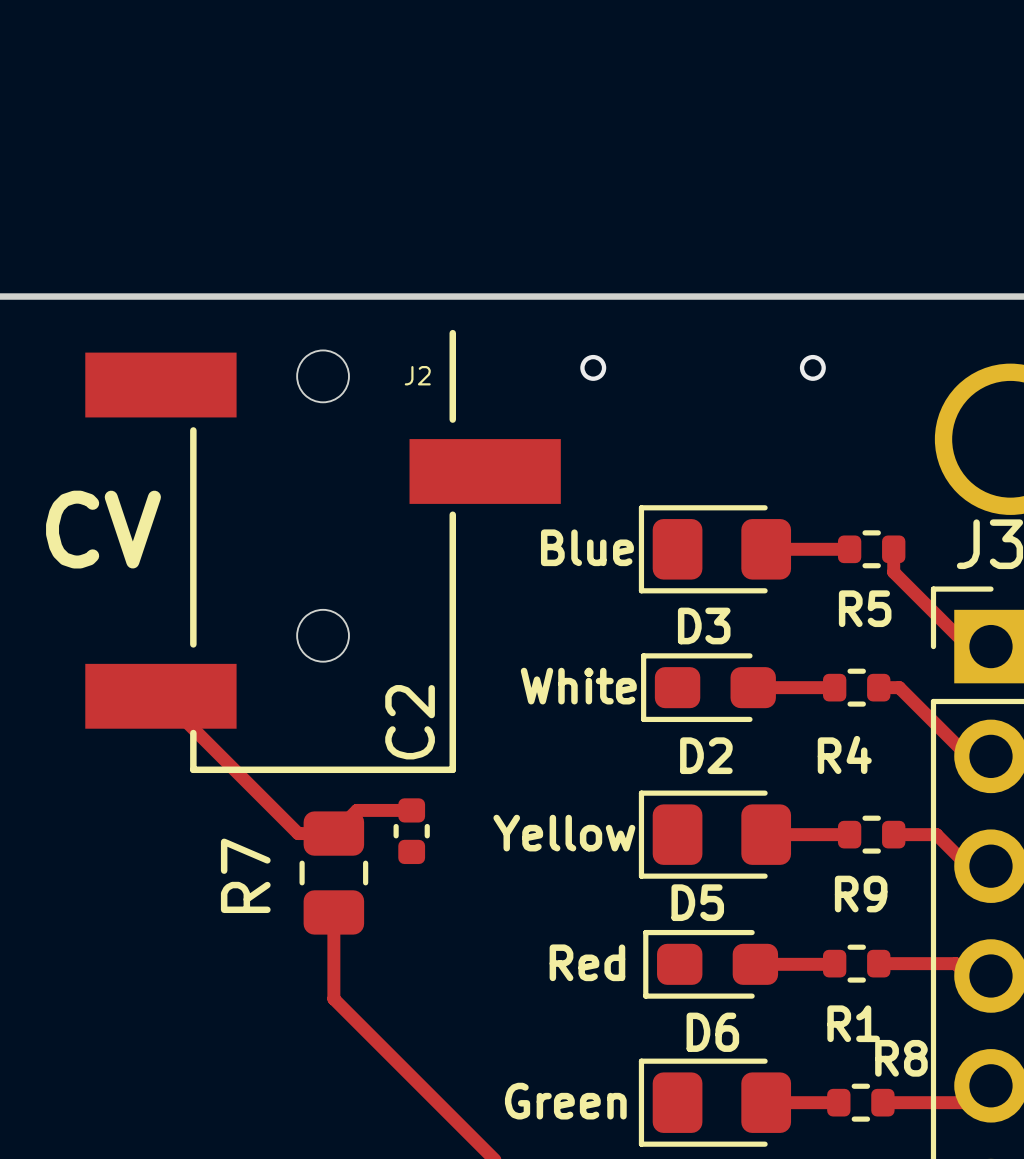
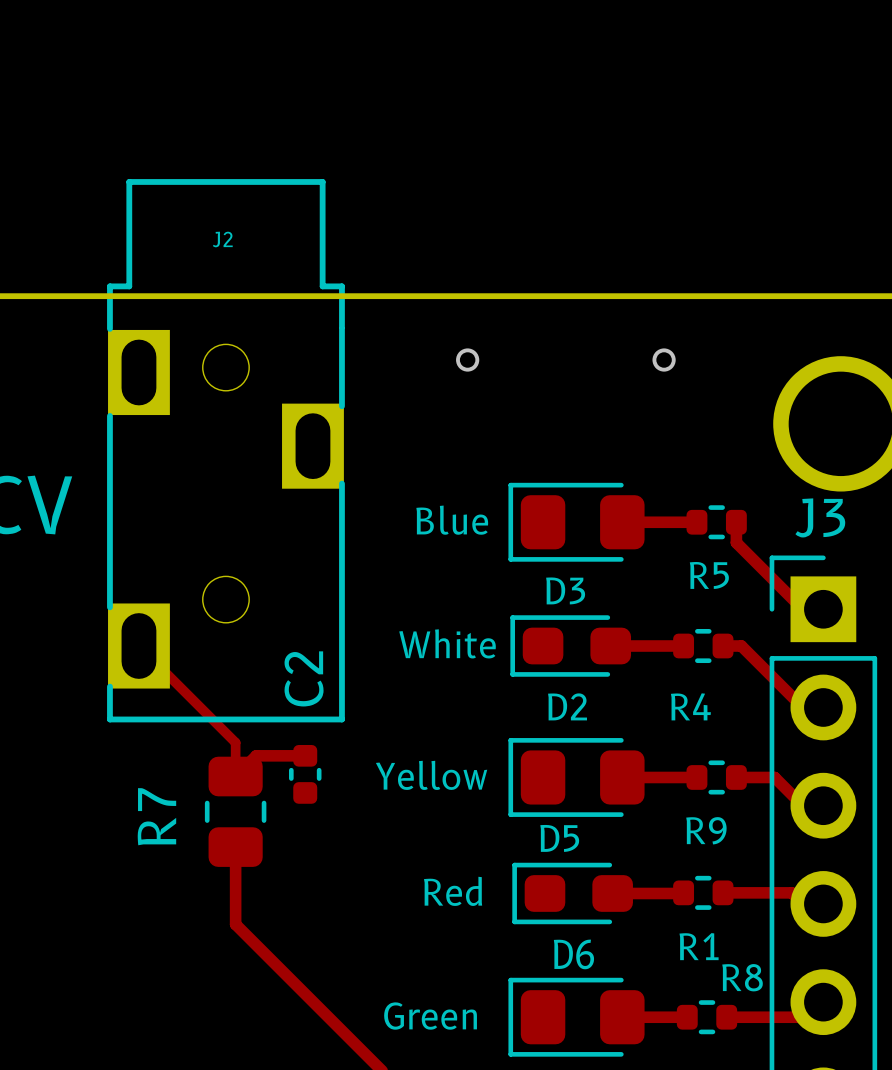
J2 footprint: [85, 329, 561, 774] -> [107, 179, 345, 723]
J2 name position: J2 (417, 375) -> J2 (222, 239)
track: (160, 696) (298, 833) (333, 833) -> (138, 646) (235, 742) (235, 776)

